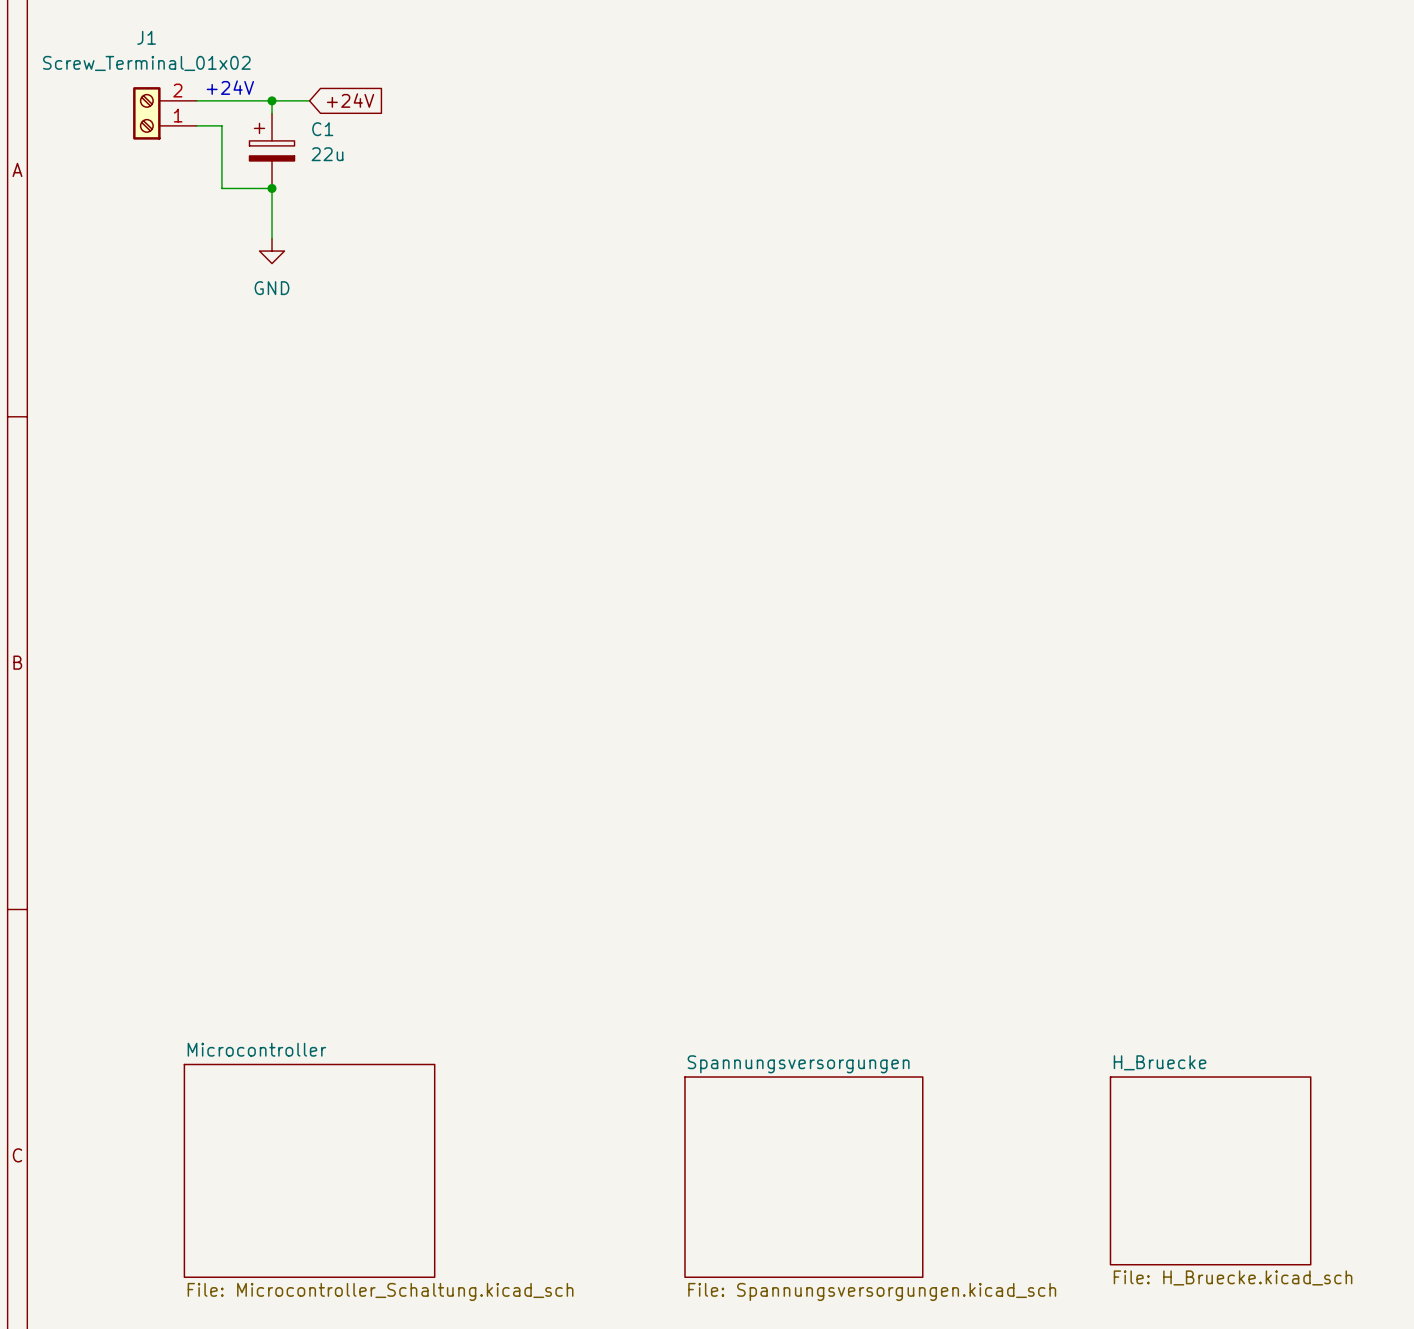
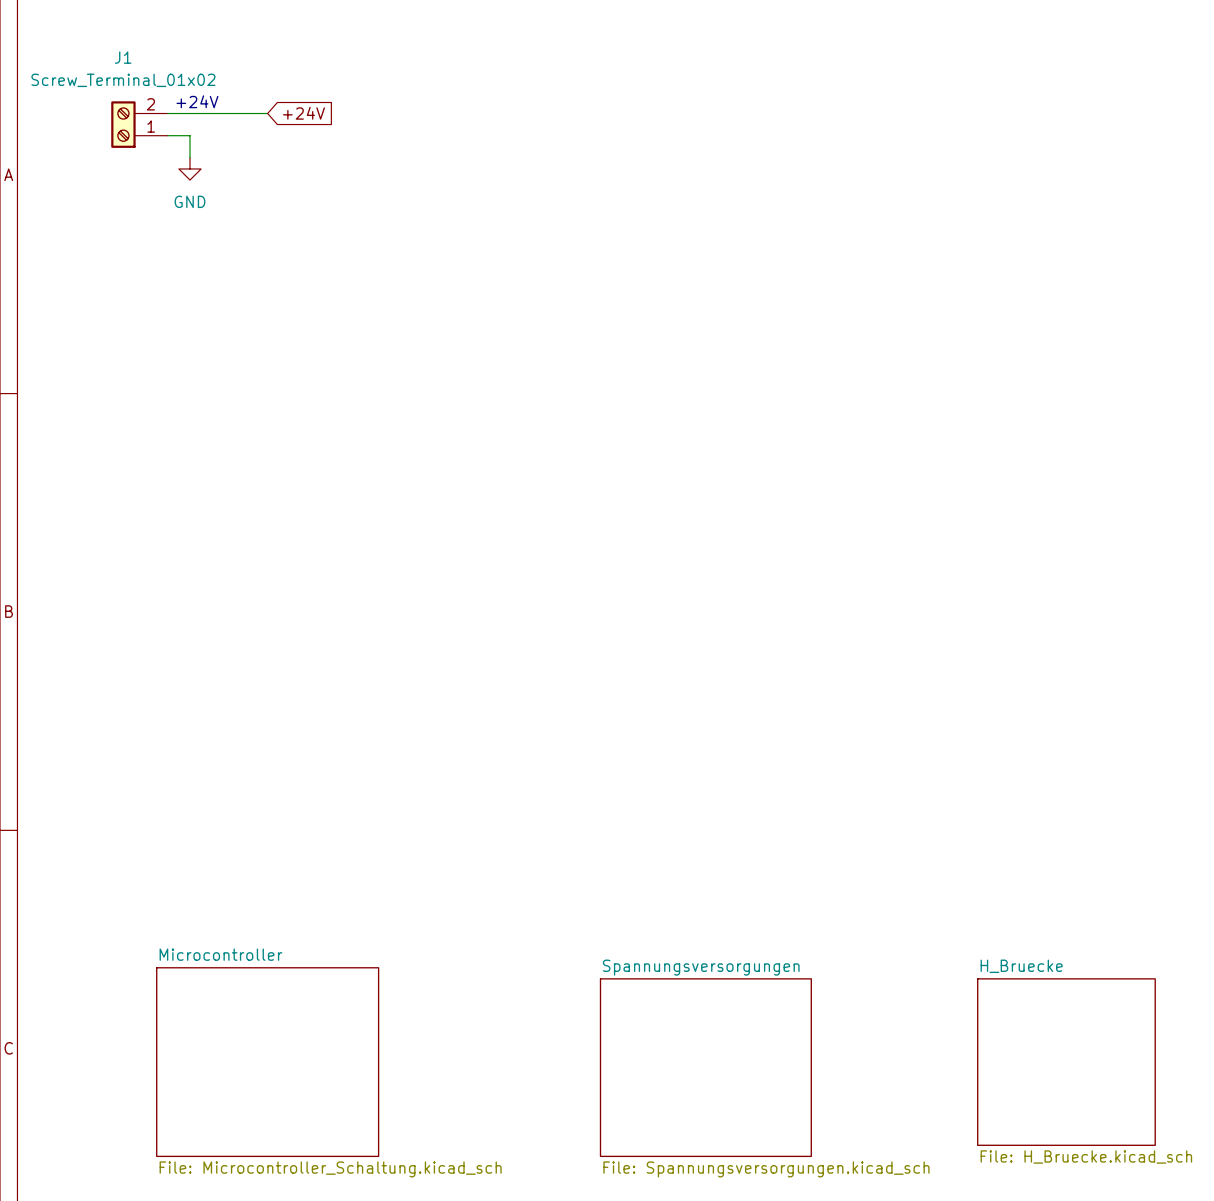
wire: (272, 100) (272, 113) -> none
junction: (272, 100) -> none
wire: (221, 150) (221, 188) (272, 188) (272, 238) -> none
C1: 22u (272, 150) -> none
junction: (272, 188) -> none
power symbol position: GND (272, 251) -> GND (190, 168)

